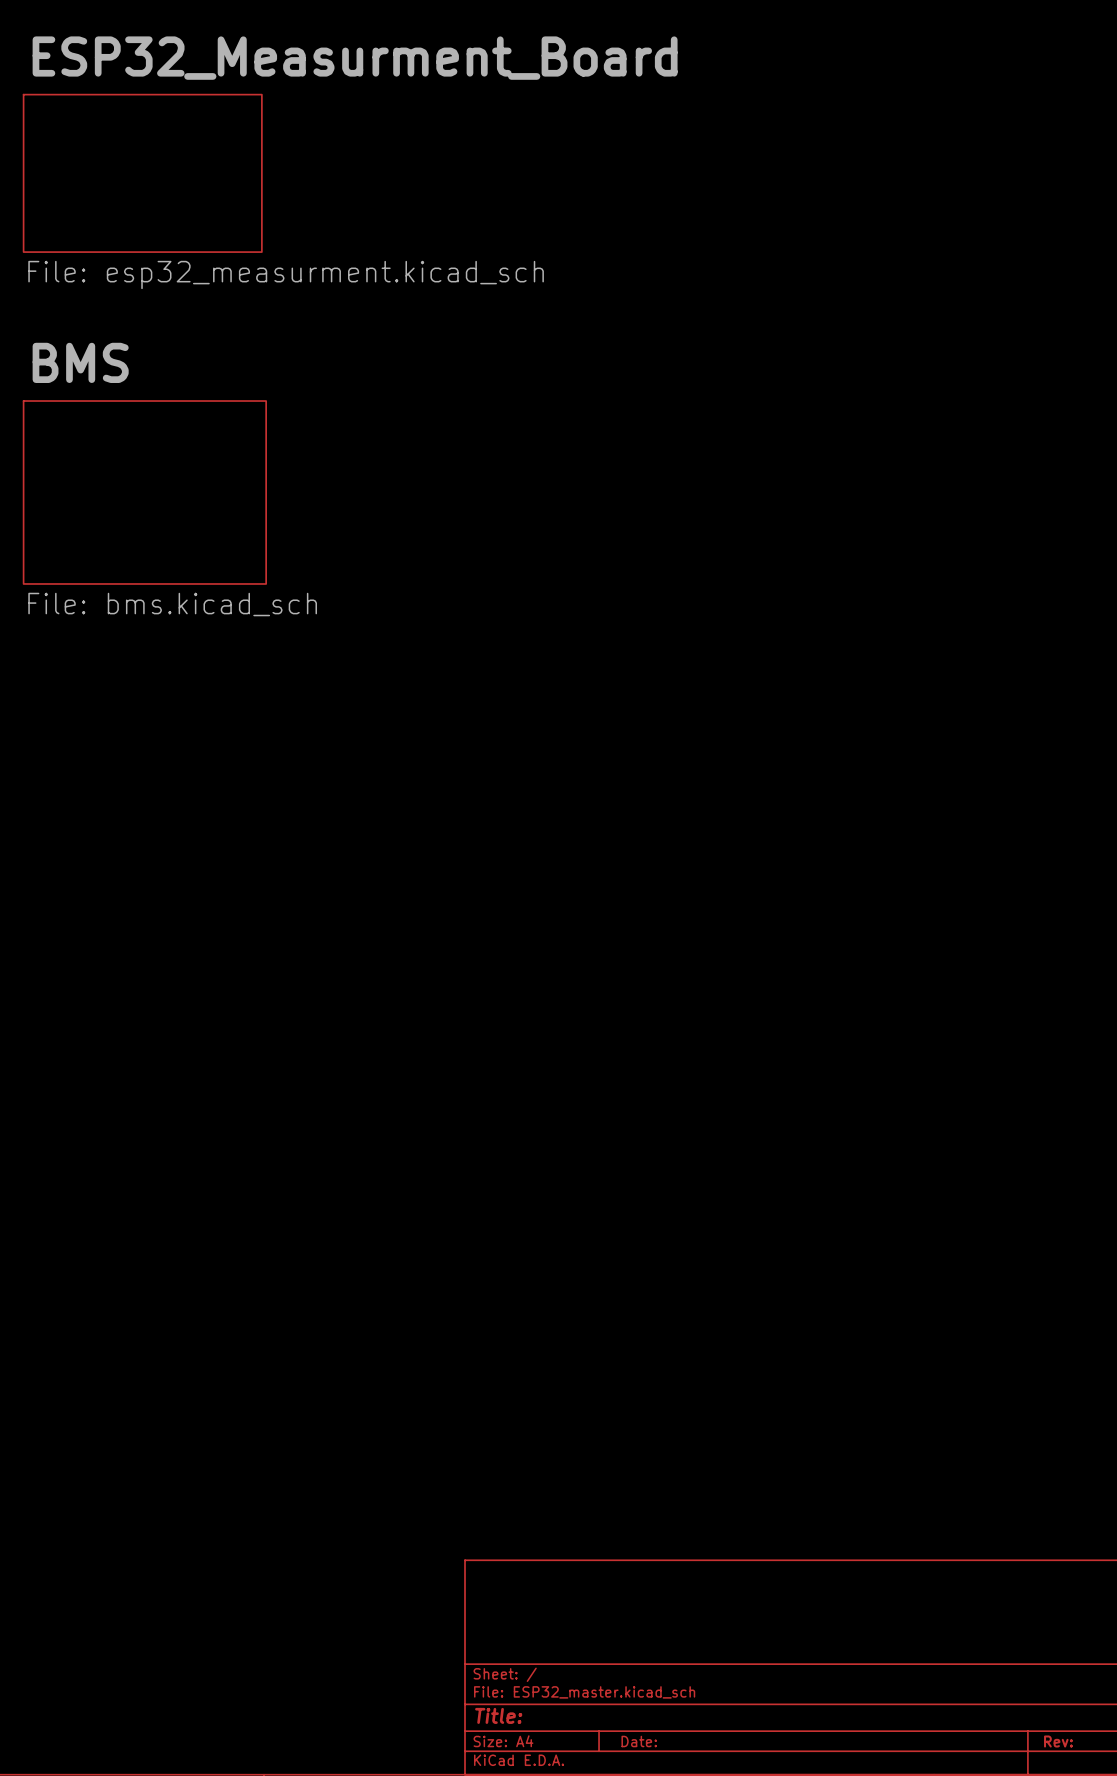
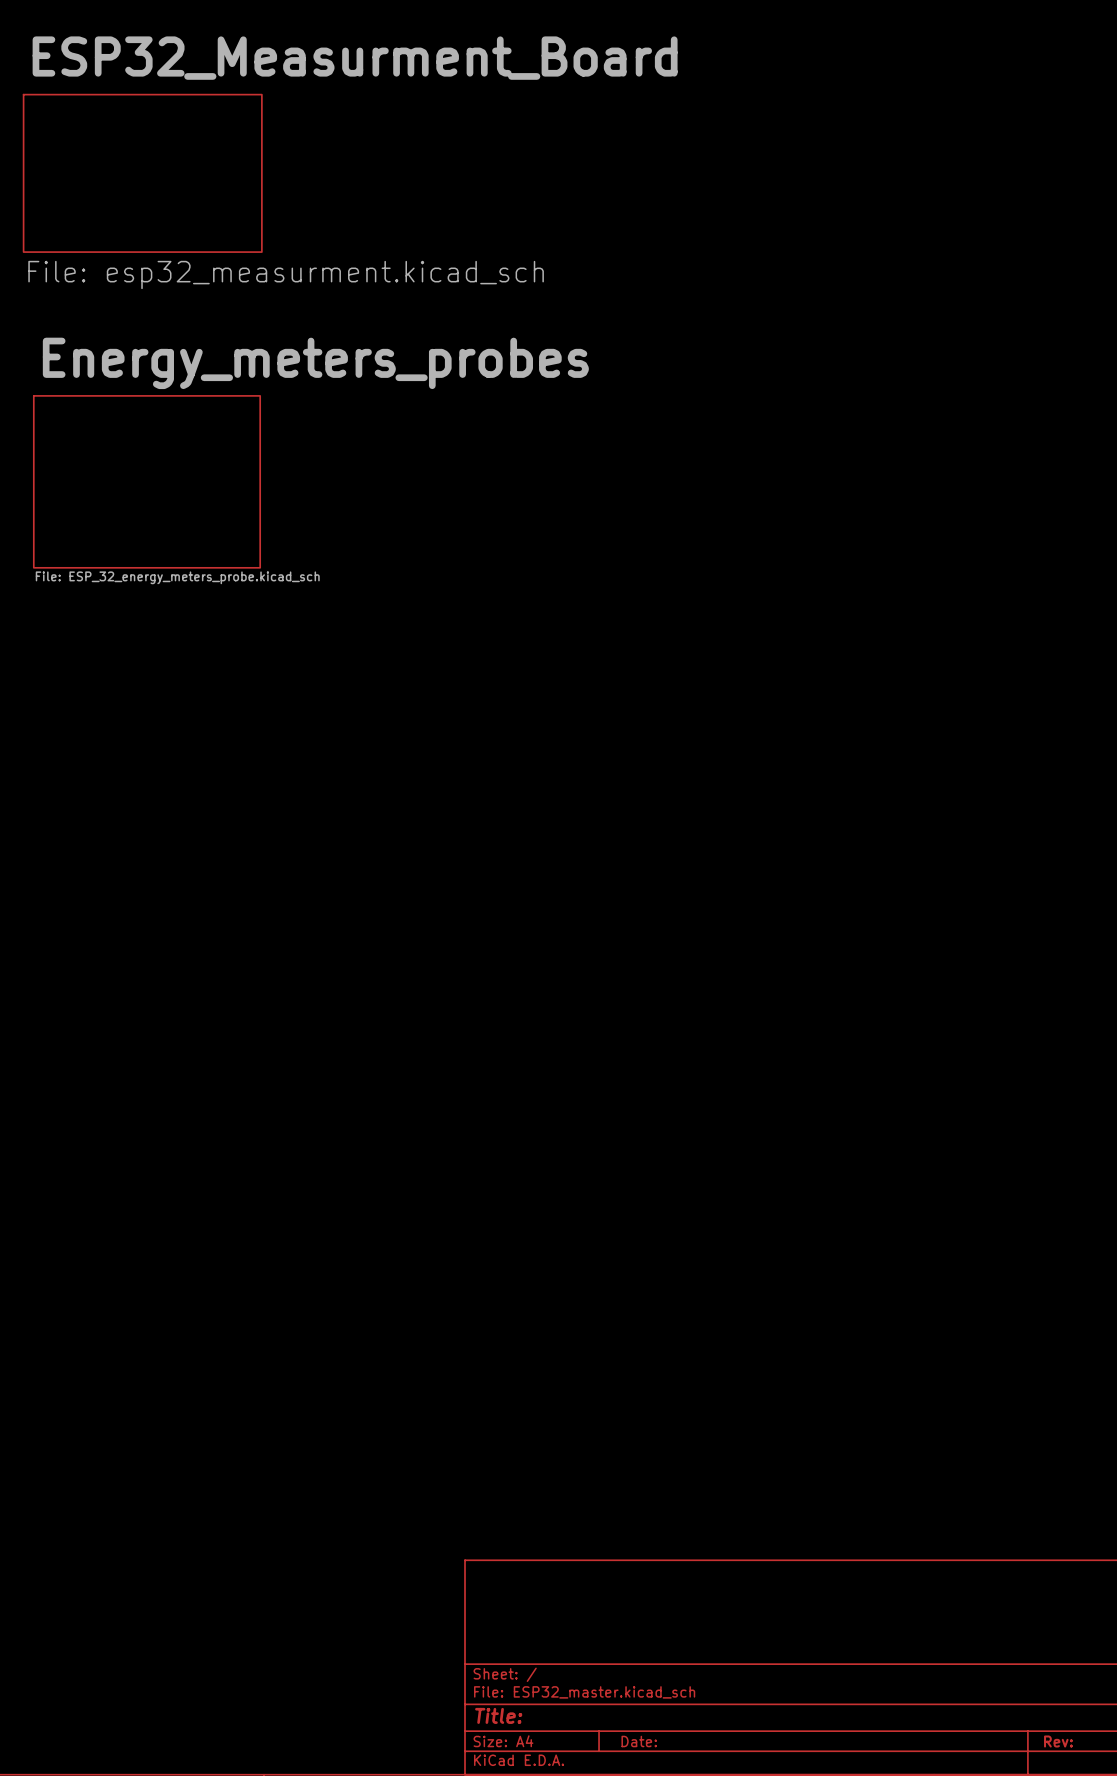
sheet Energy_meters_probes: none -> File: ESP_32_energy_meters_probe.kicad_sch (146, 481)
sheet BMS: File: bms.kicad_sch (144, 492) -> none

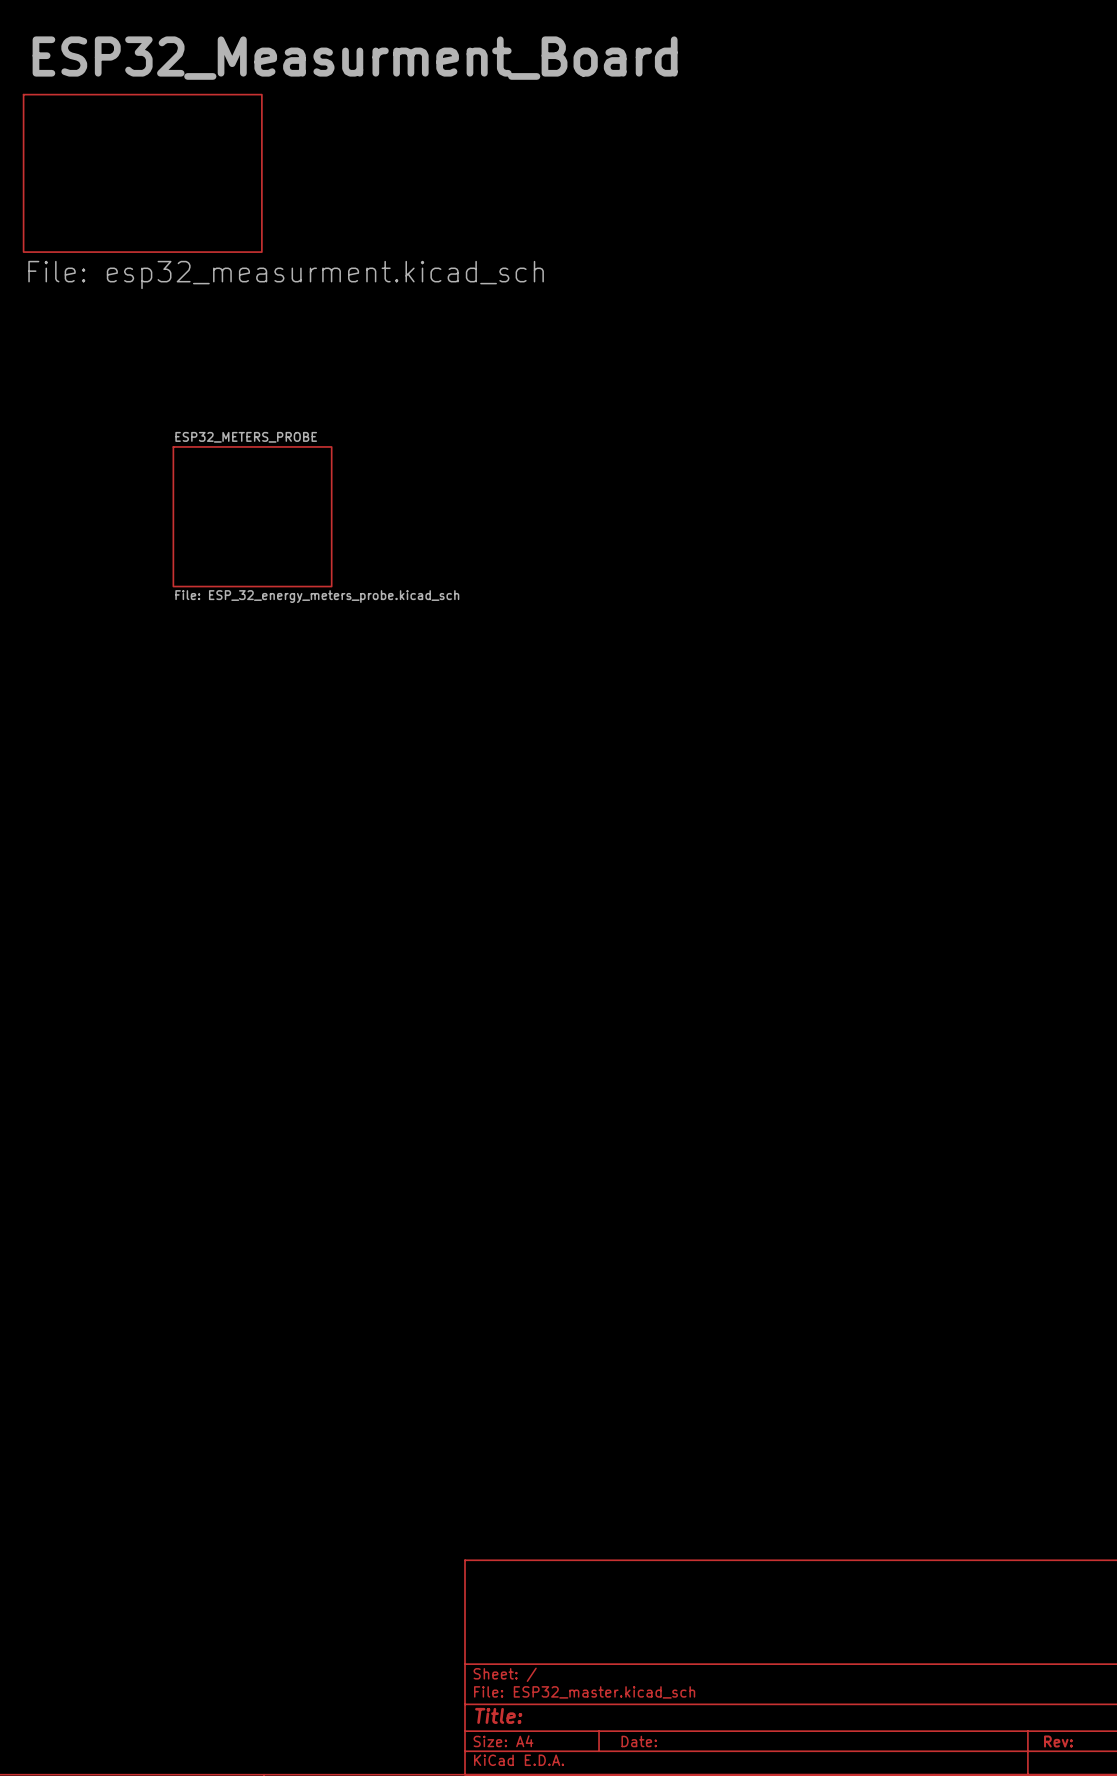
sheet Energy_meters_probes: File: ESP_32_energy_meters_probe.kicad_sch (146, 481) -> none
sheet ESP32_METERS_PROBE: none -> File: ESP_32_energy_meters_probe.kicad_sch (252, 516)

